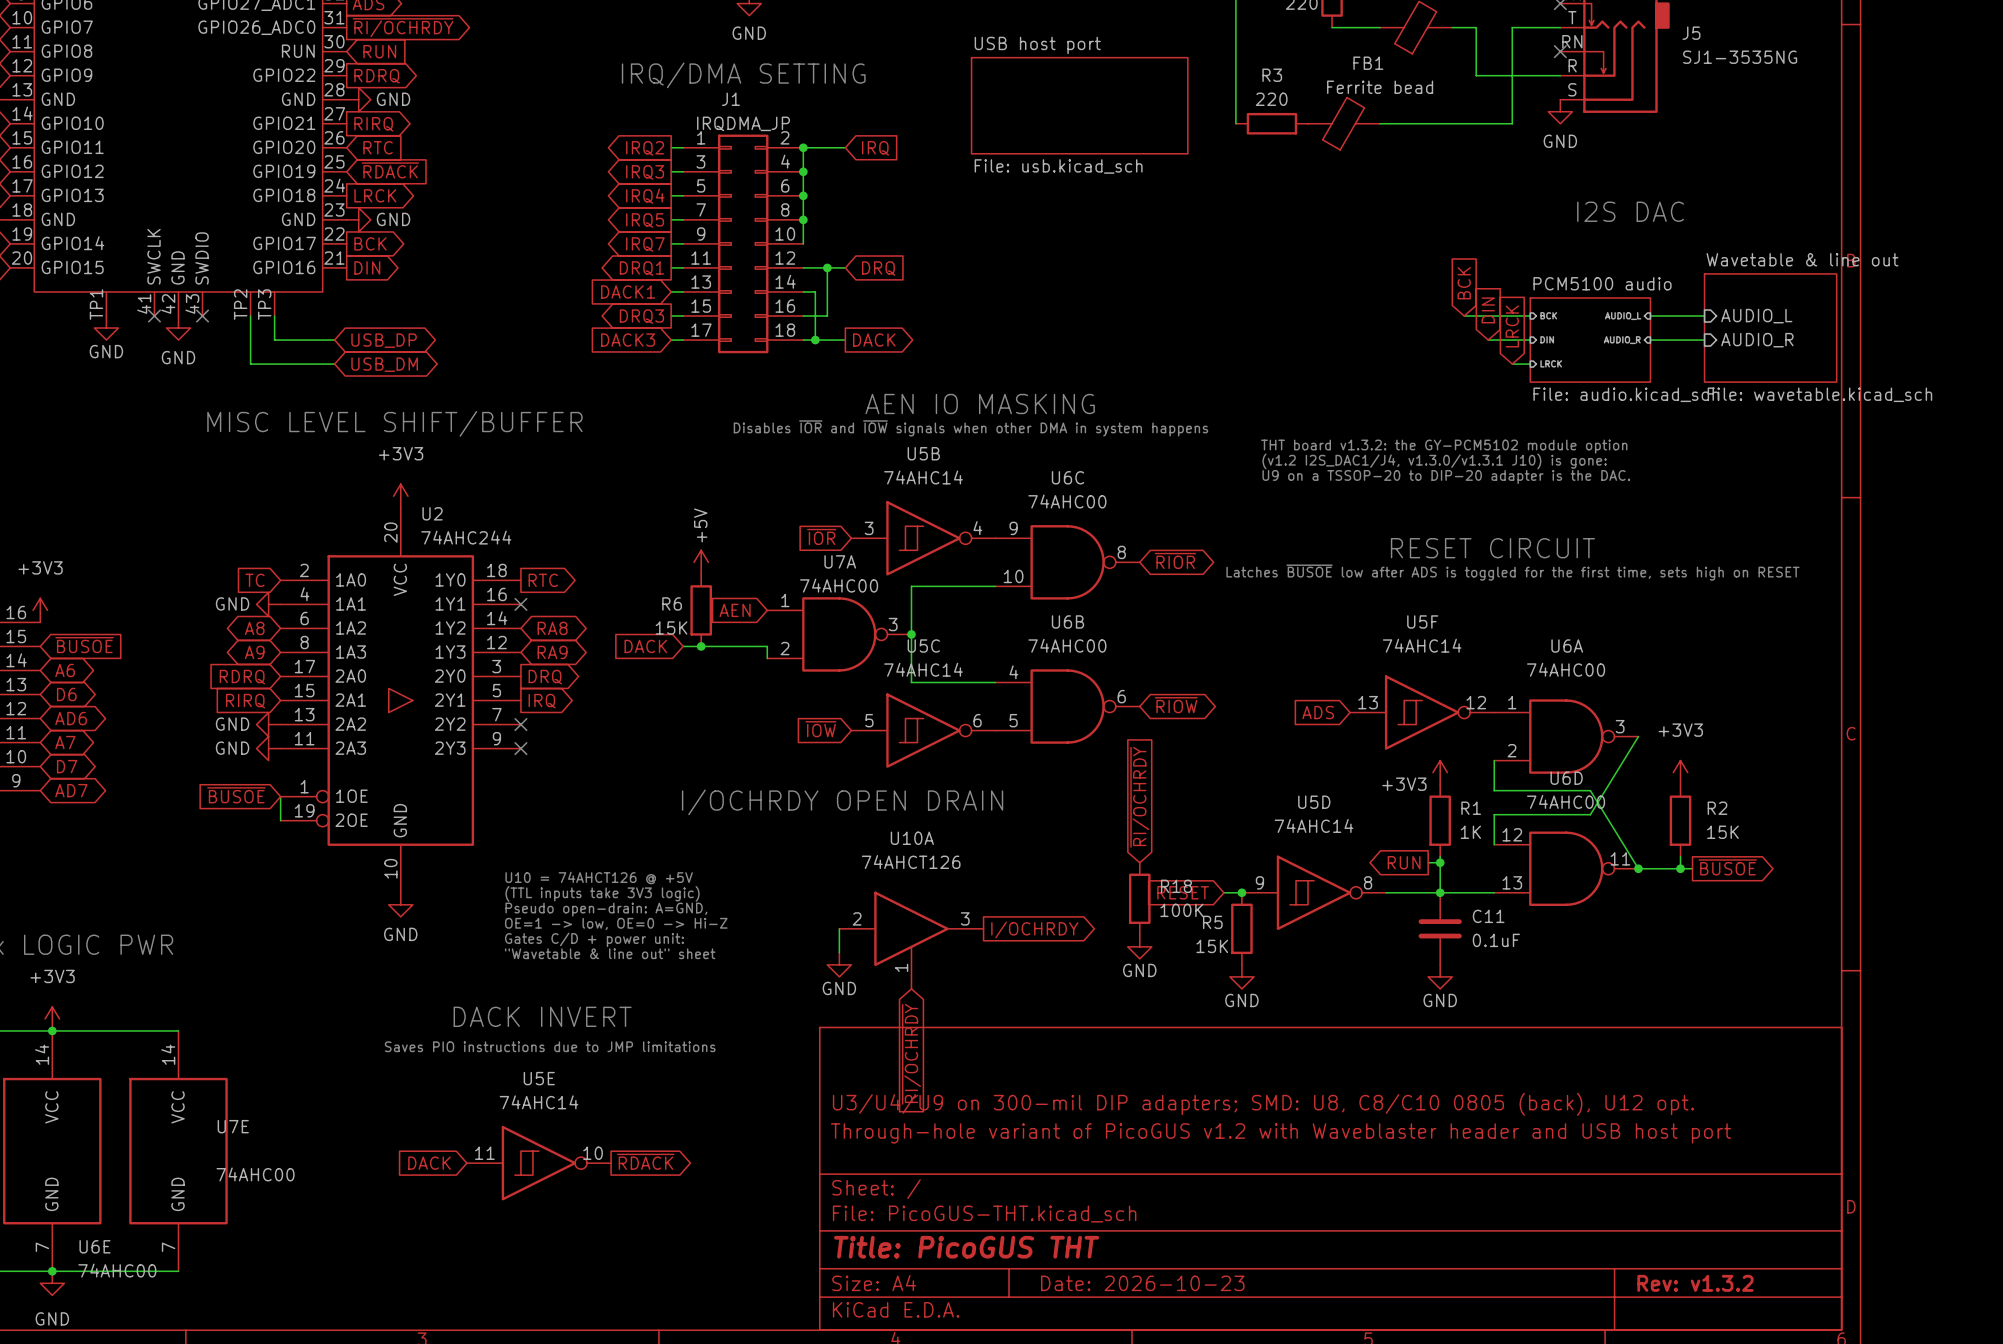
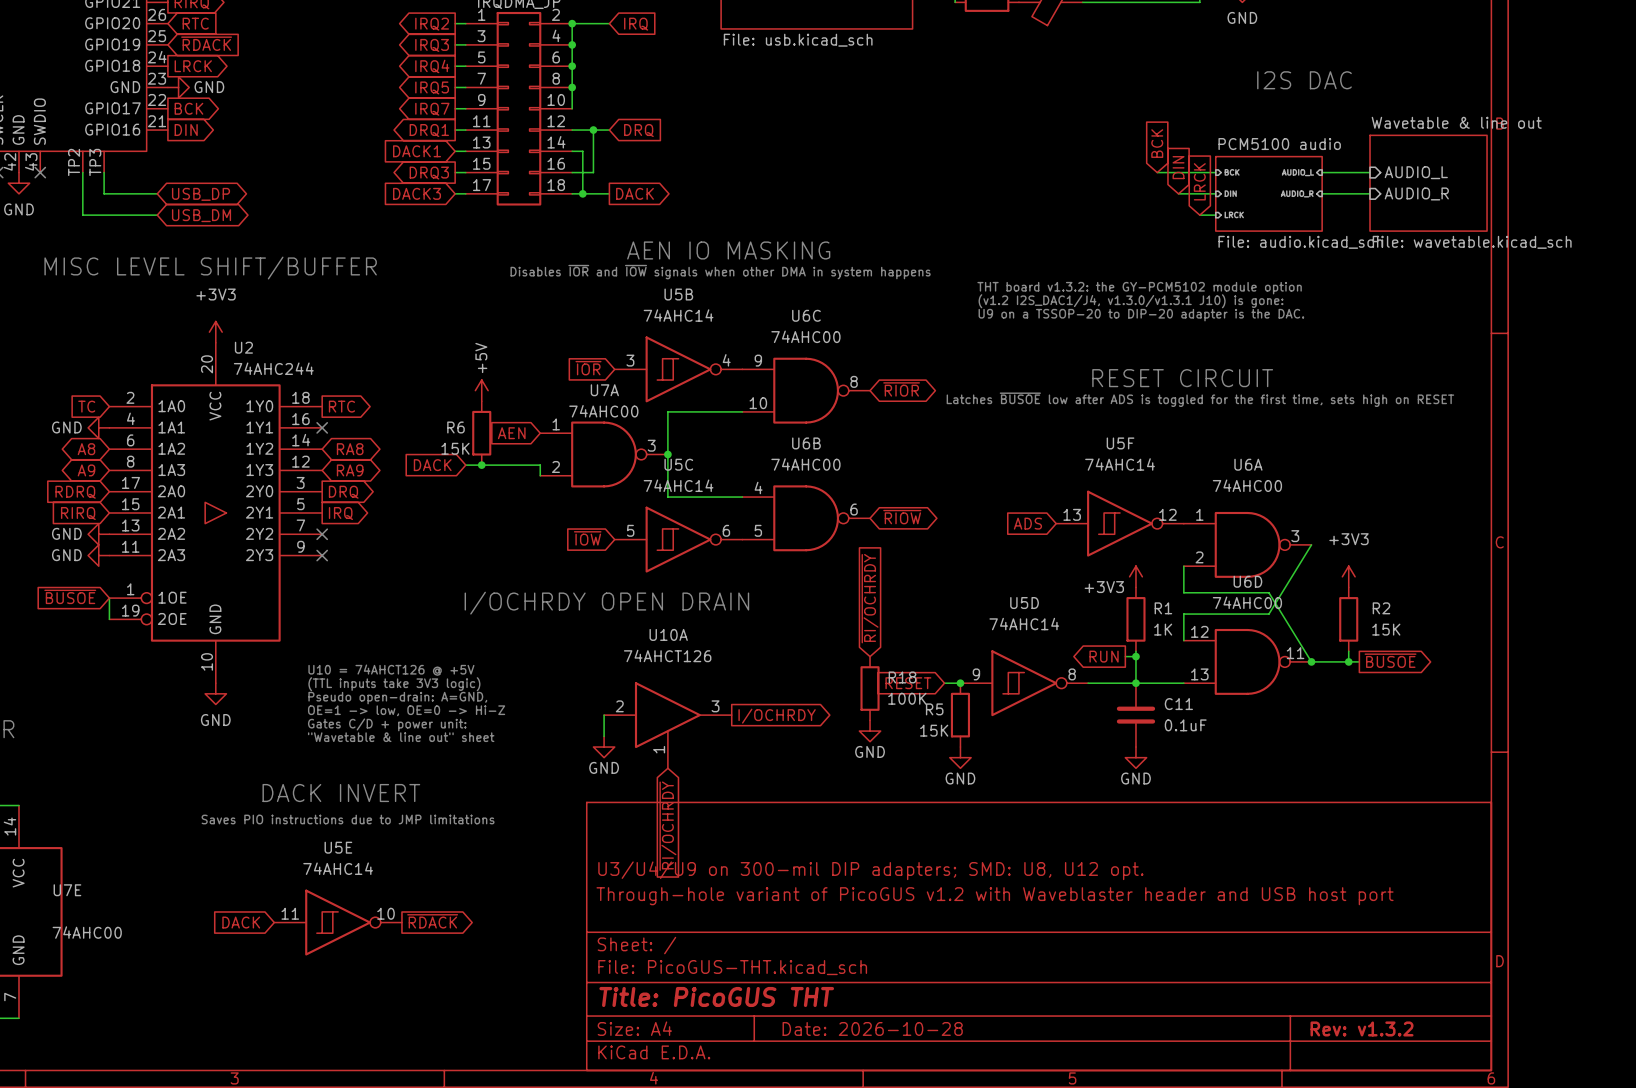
title block: U3/U4/U9 on 300-mil DIP adapters; SMD: U8, C8/C10 0805 (back), U12 opt. (1263, 1104) -> U3/U4/U9 on 300-mil DIP adapters; SMD: U8, U12 opt. (870, 870)
title block: Date: 2026-10-23 (1142, 1283) -> Date: 2026-10-28 (872, 1028)

